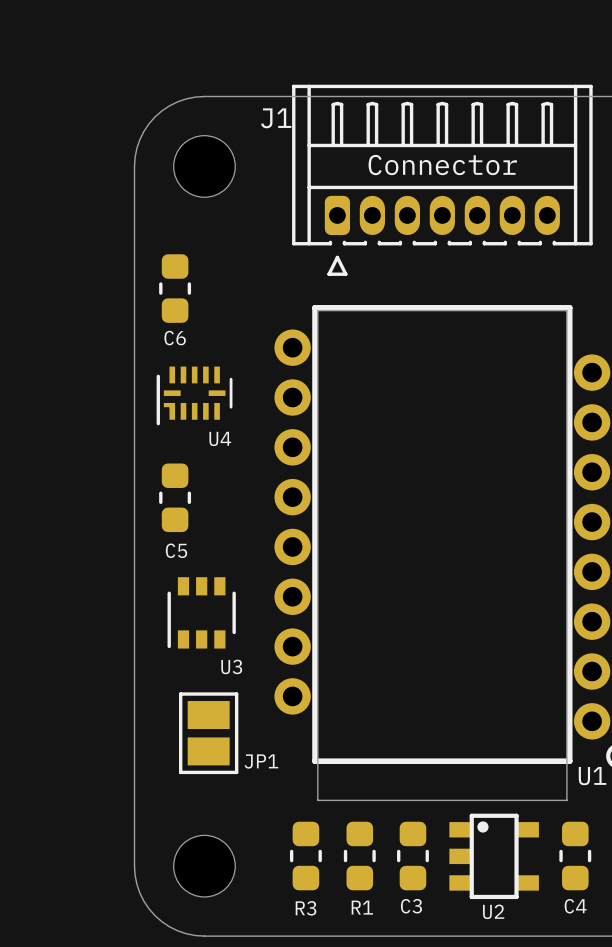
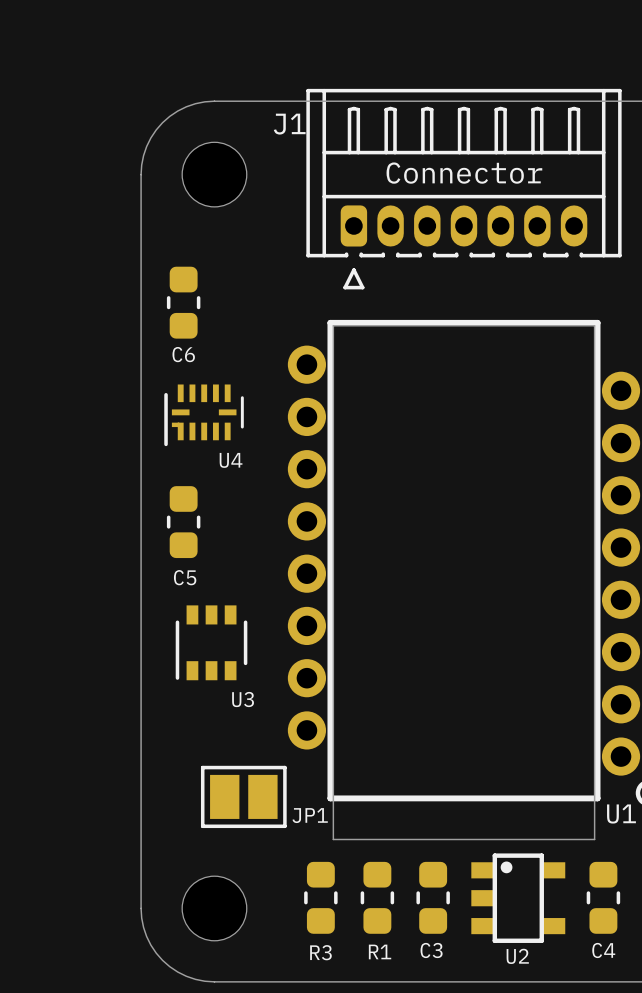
JP1 rotation: 0° (208, 733) -> 90° clockwise (243, 796)

